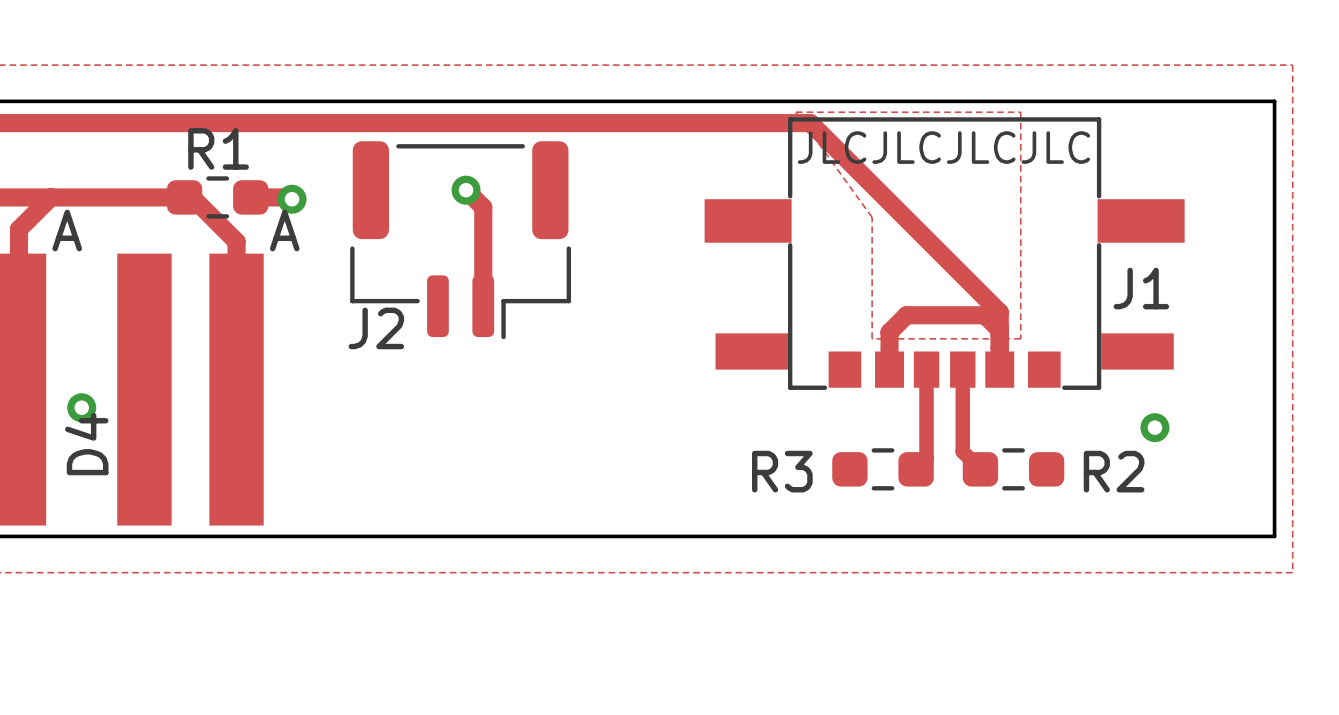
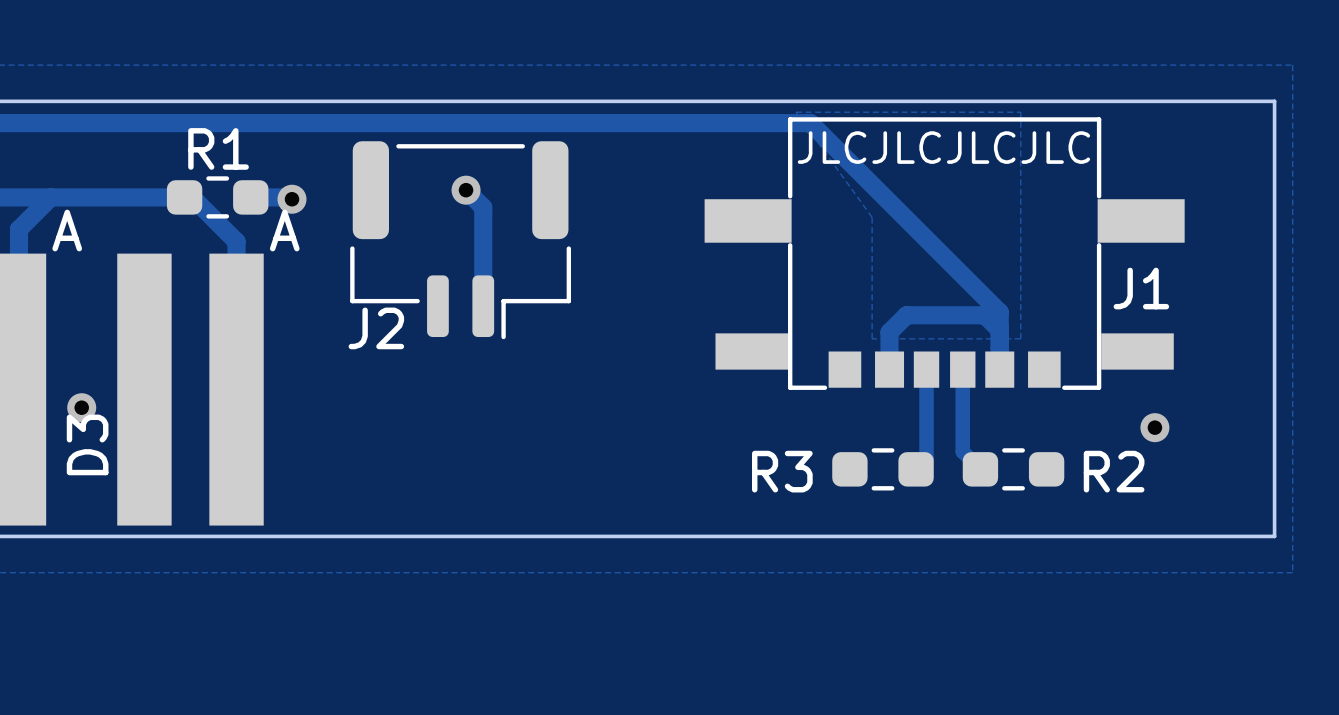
D4 name: D4 (86, 444) -> D3 (87, 444)

